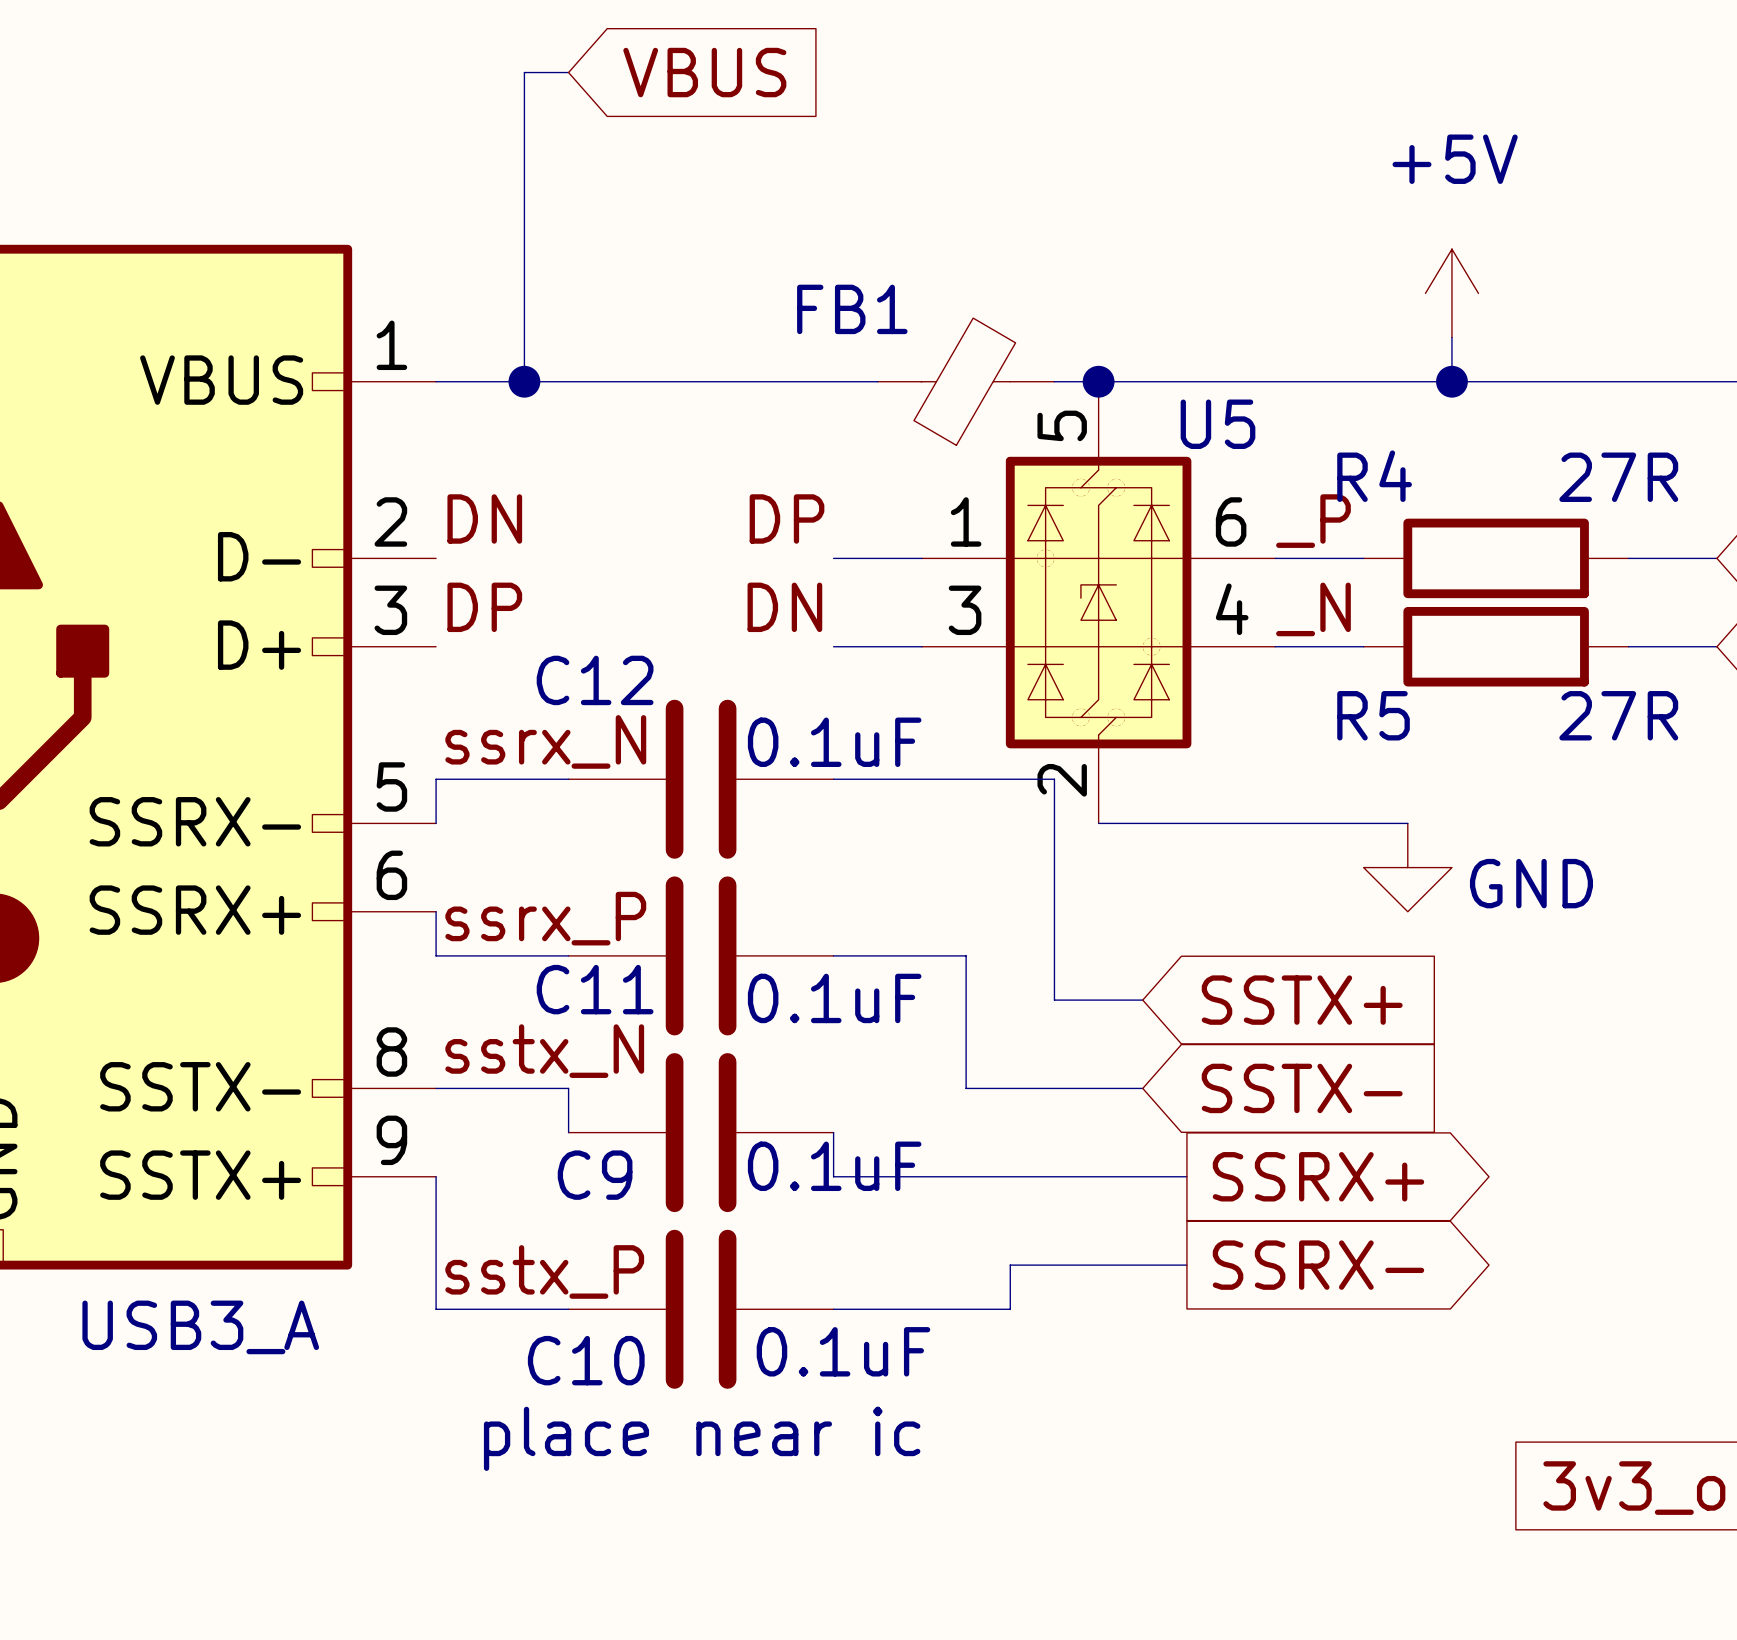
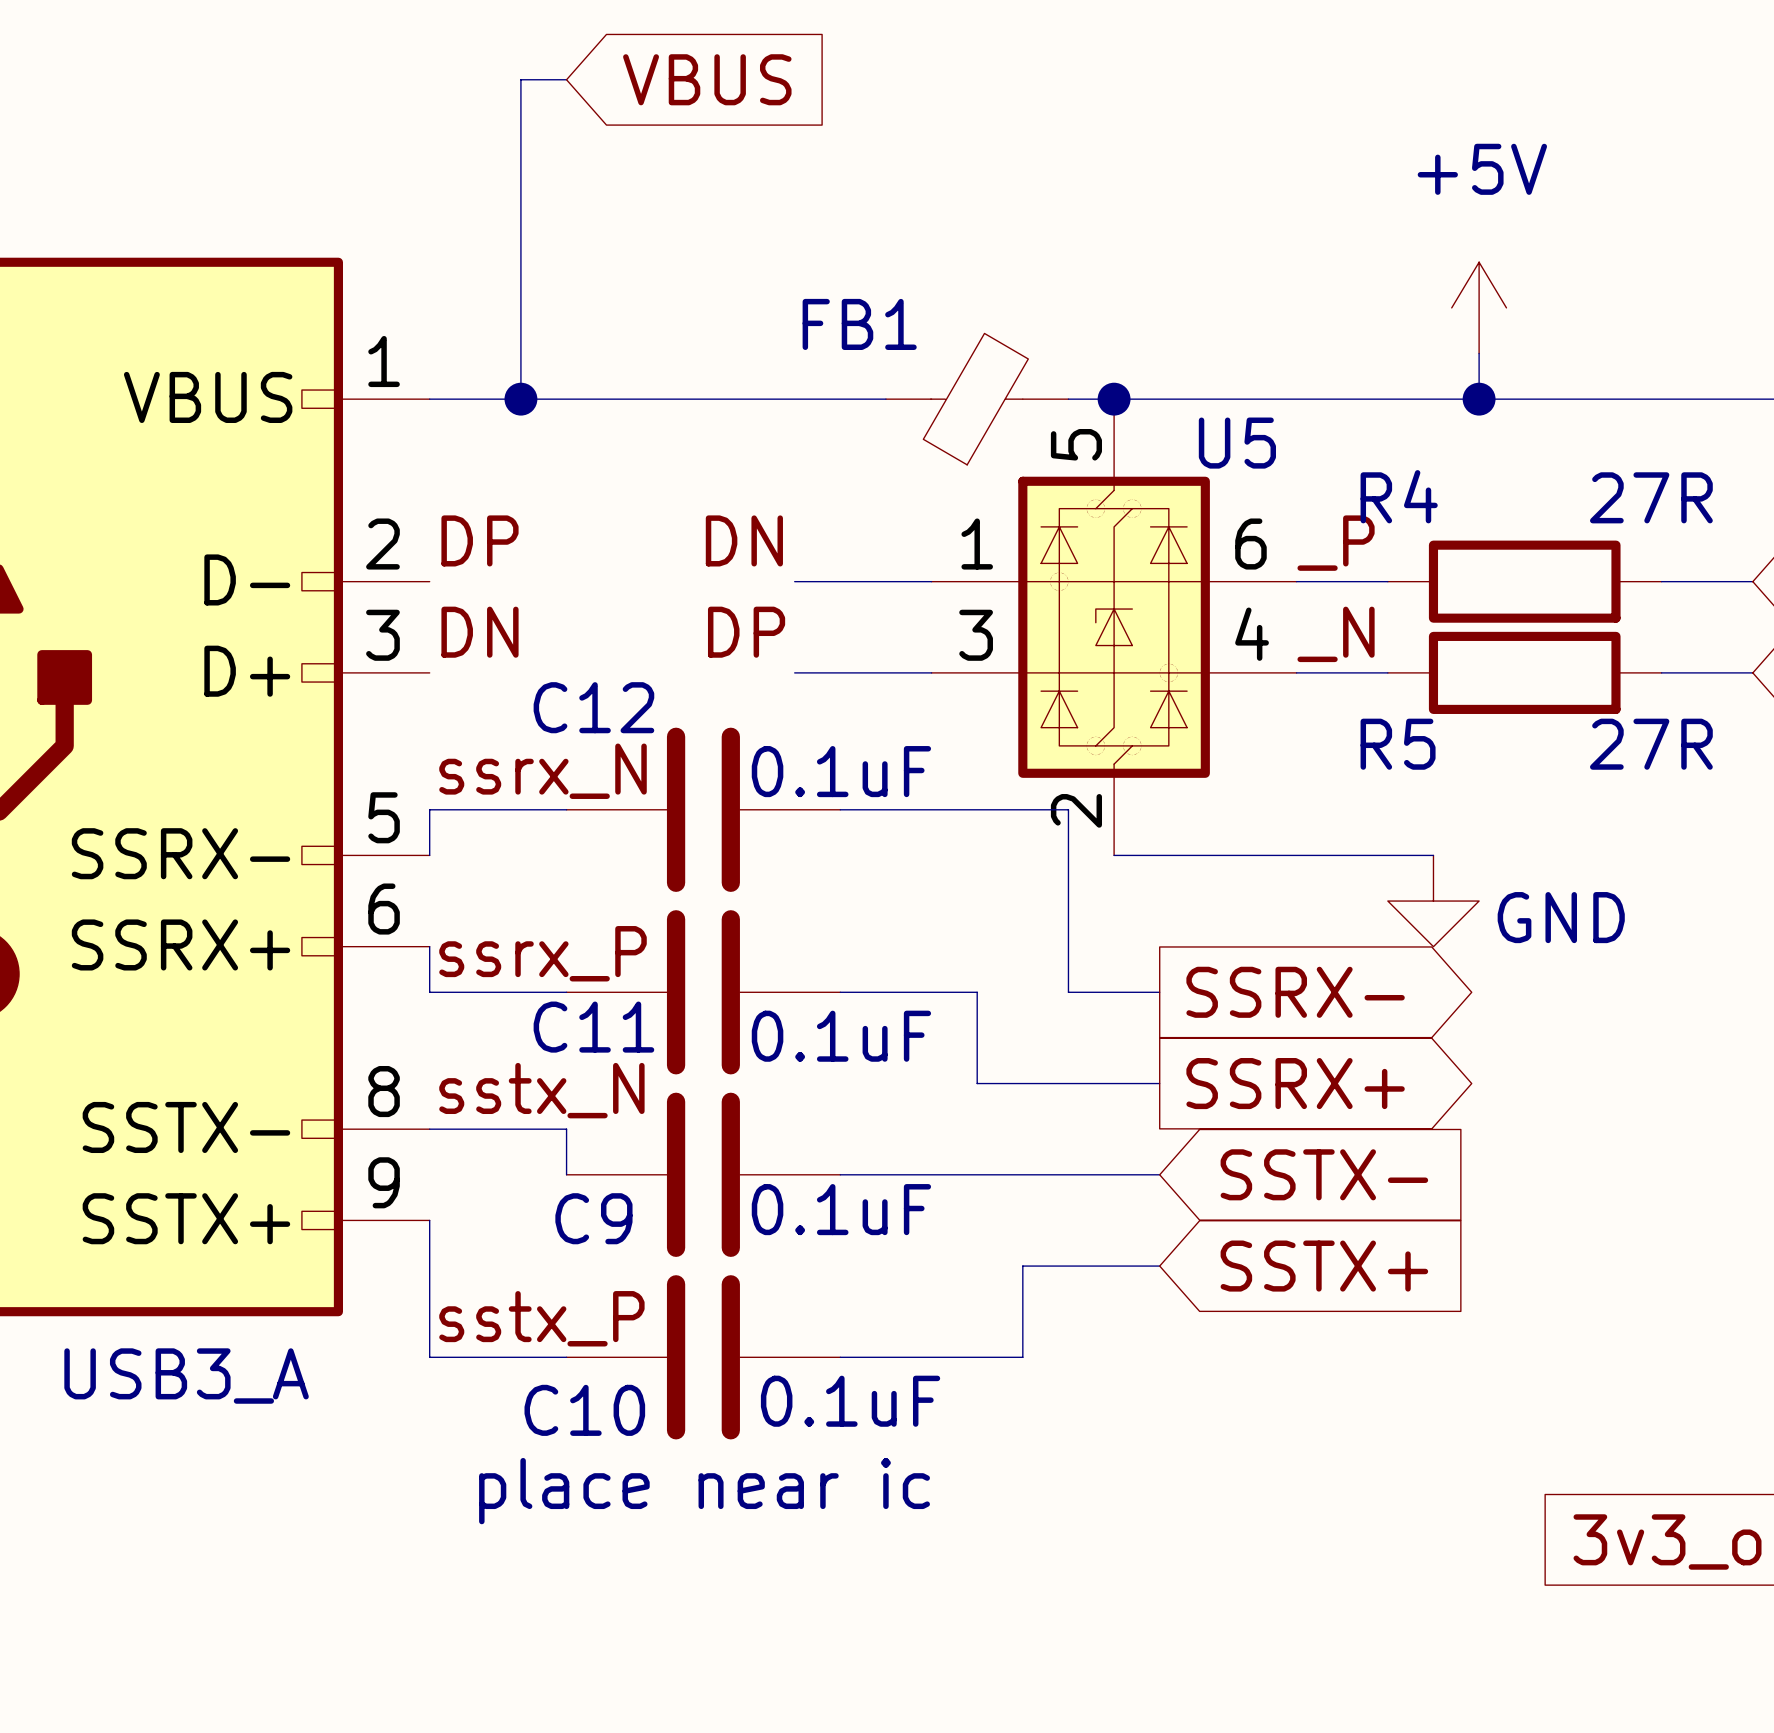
label: DN (484, 518) -> DP (480, 540)
label position: DP (786, 518) -> DP (746, 632)
wire: none -> (794, 581) (840, 581)
label: DP (484, 607) -> DN (480, 632)
label position: DN (784, 607) -> DN (744, 540)
wire: none -> (794, 672) (840, 672)
wire: (1054, 955) (1054, 1000) (1142, 1000) -> (1068, 992) (1159, 992)
global label position: SSTX+ (1302, 1000) -> SSTX+ (1324, 1266)
wire: (966, 1044) (966, 1088) (1142, 1088) -> (977, 1083) (1159, 1083)
global label position: SSTX- (1302, 1088) -> SSTX- (1324, 1174)
wire: (833, 1132) (833, 1176) (1186, 1176) -> (840, 1174) (1159, 1174)
global label position: SSRX+ (1318, 1176) -> SSRX+ (1295, 1083)
wire: (1010, 1265) (1186, 1265) -> (1022, 1311) (1022, 1266) (1159, 1266)
global label position: SSRX- (1318, 1265) -> SSRX- (1295, 992)

